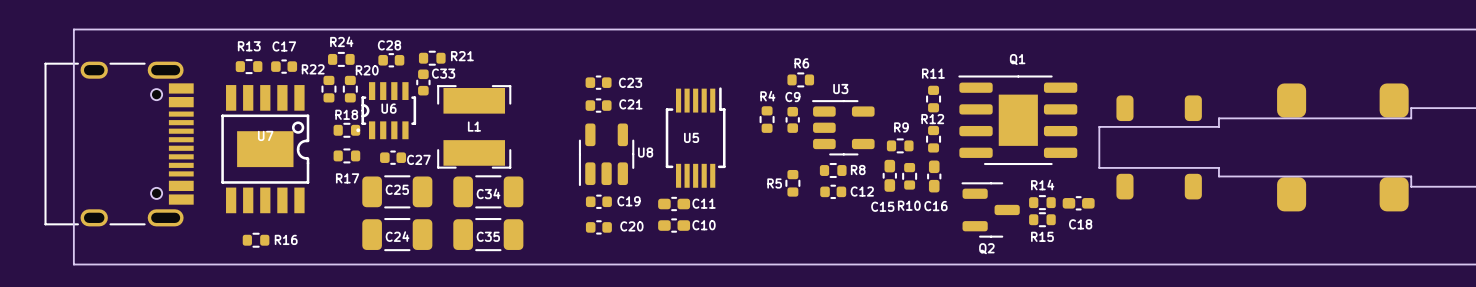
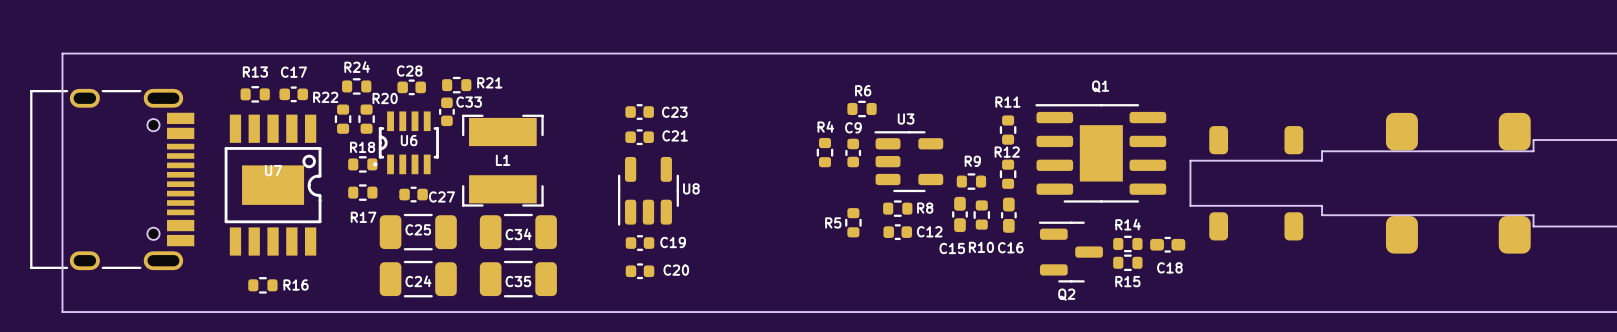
U5: (695, 137) -> none
C11: (674, 204) -> none
C10: (674, 225) -> none

